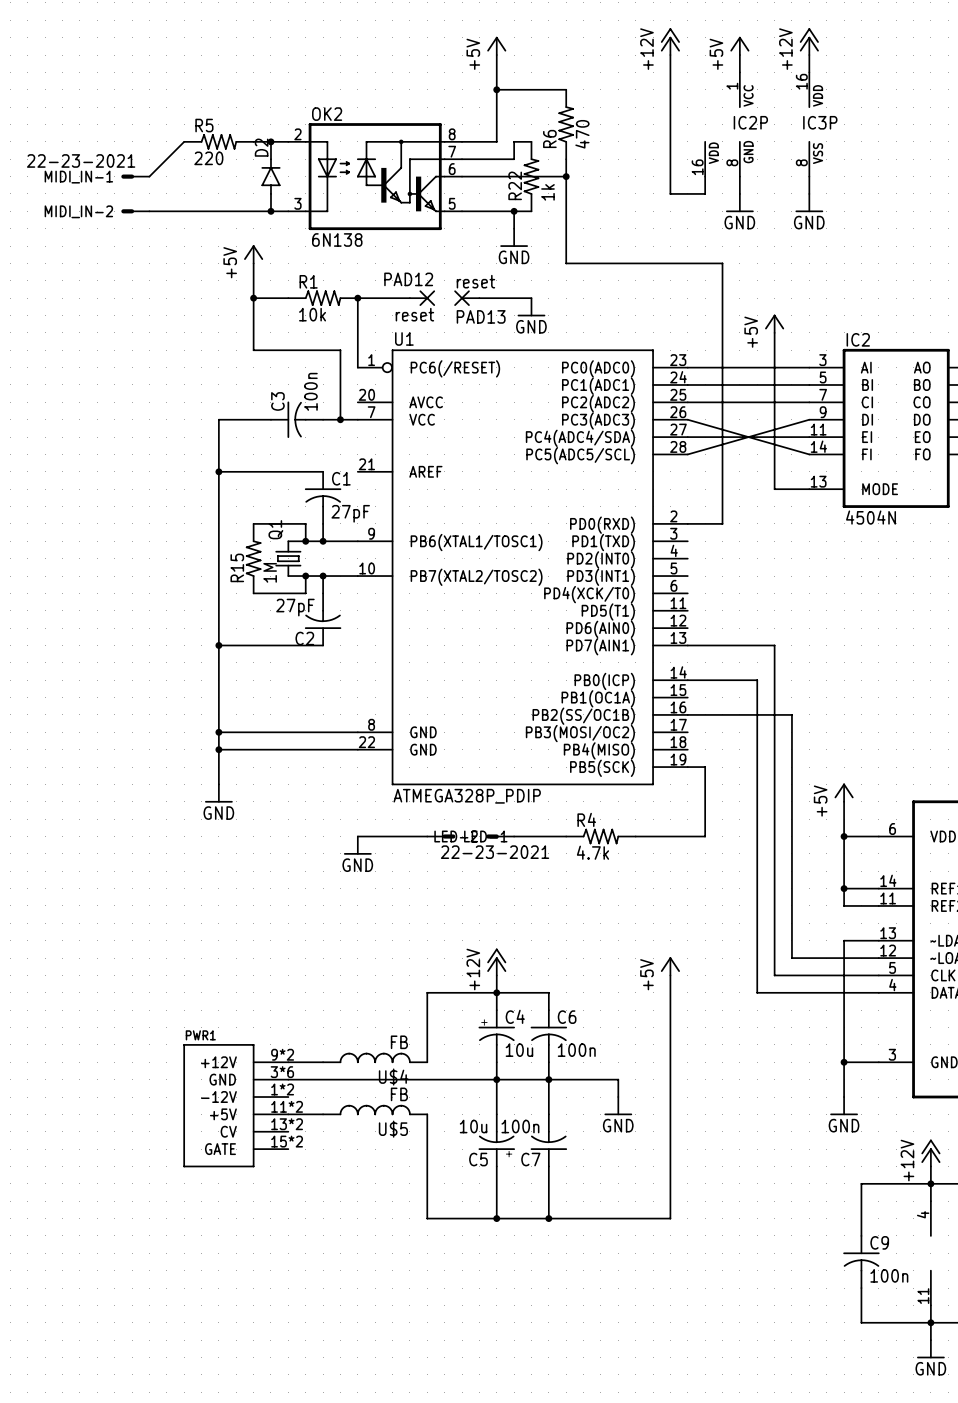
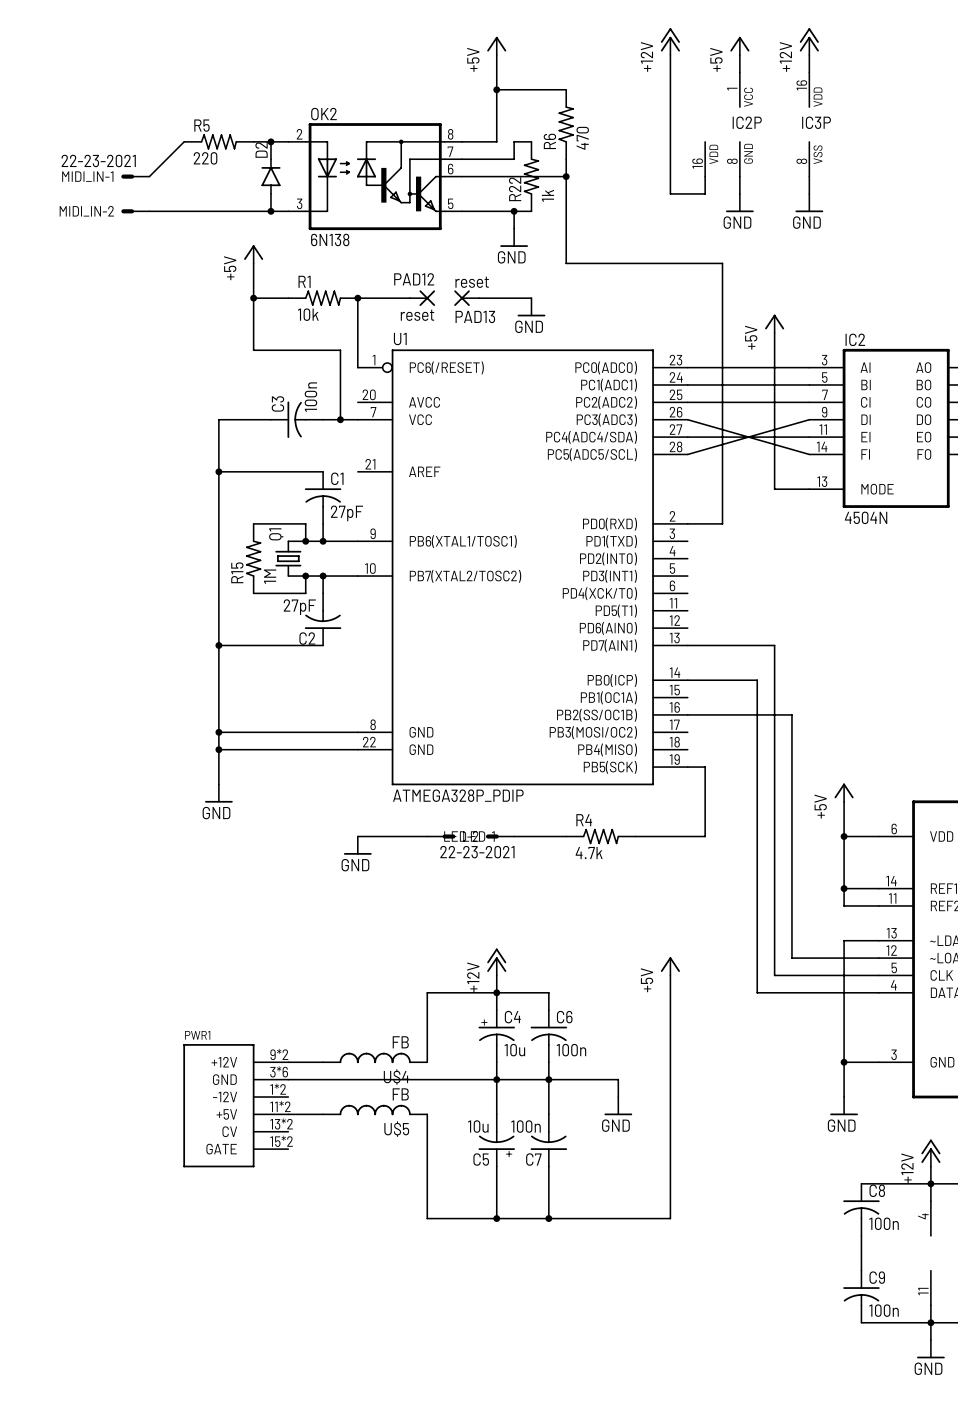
C8: none -> 100n (861, 1209)
C9 position: (861, 1261) -> (861, 1296)

